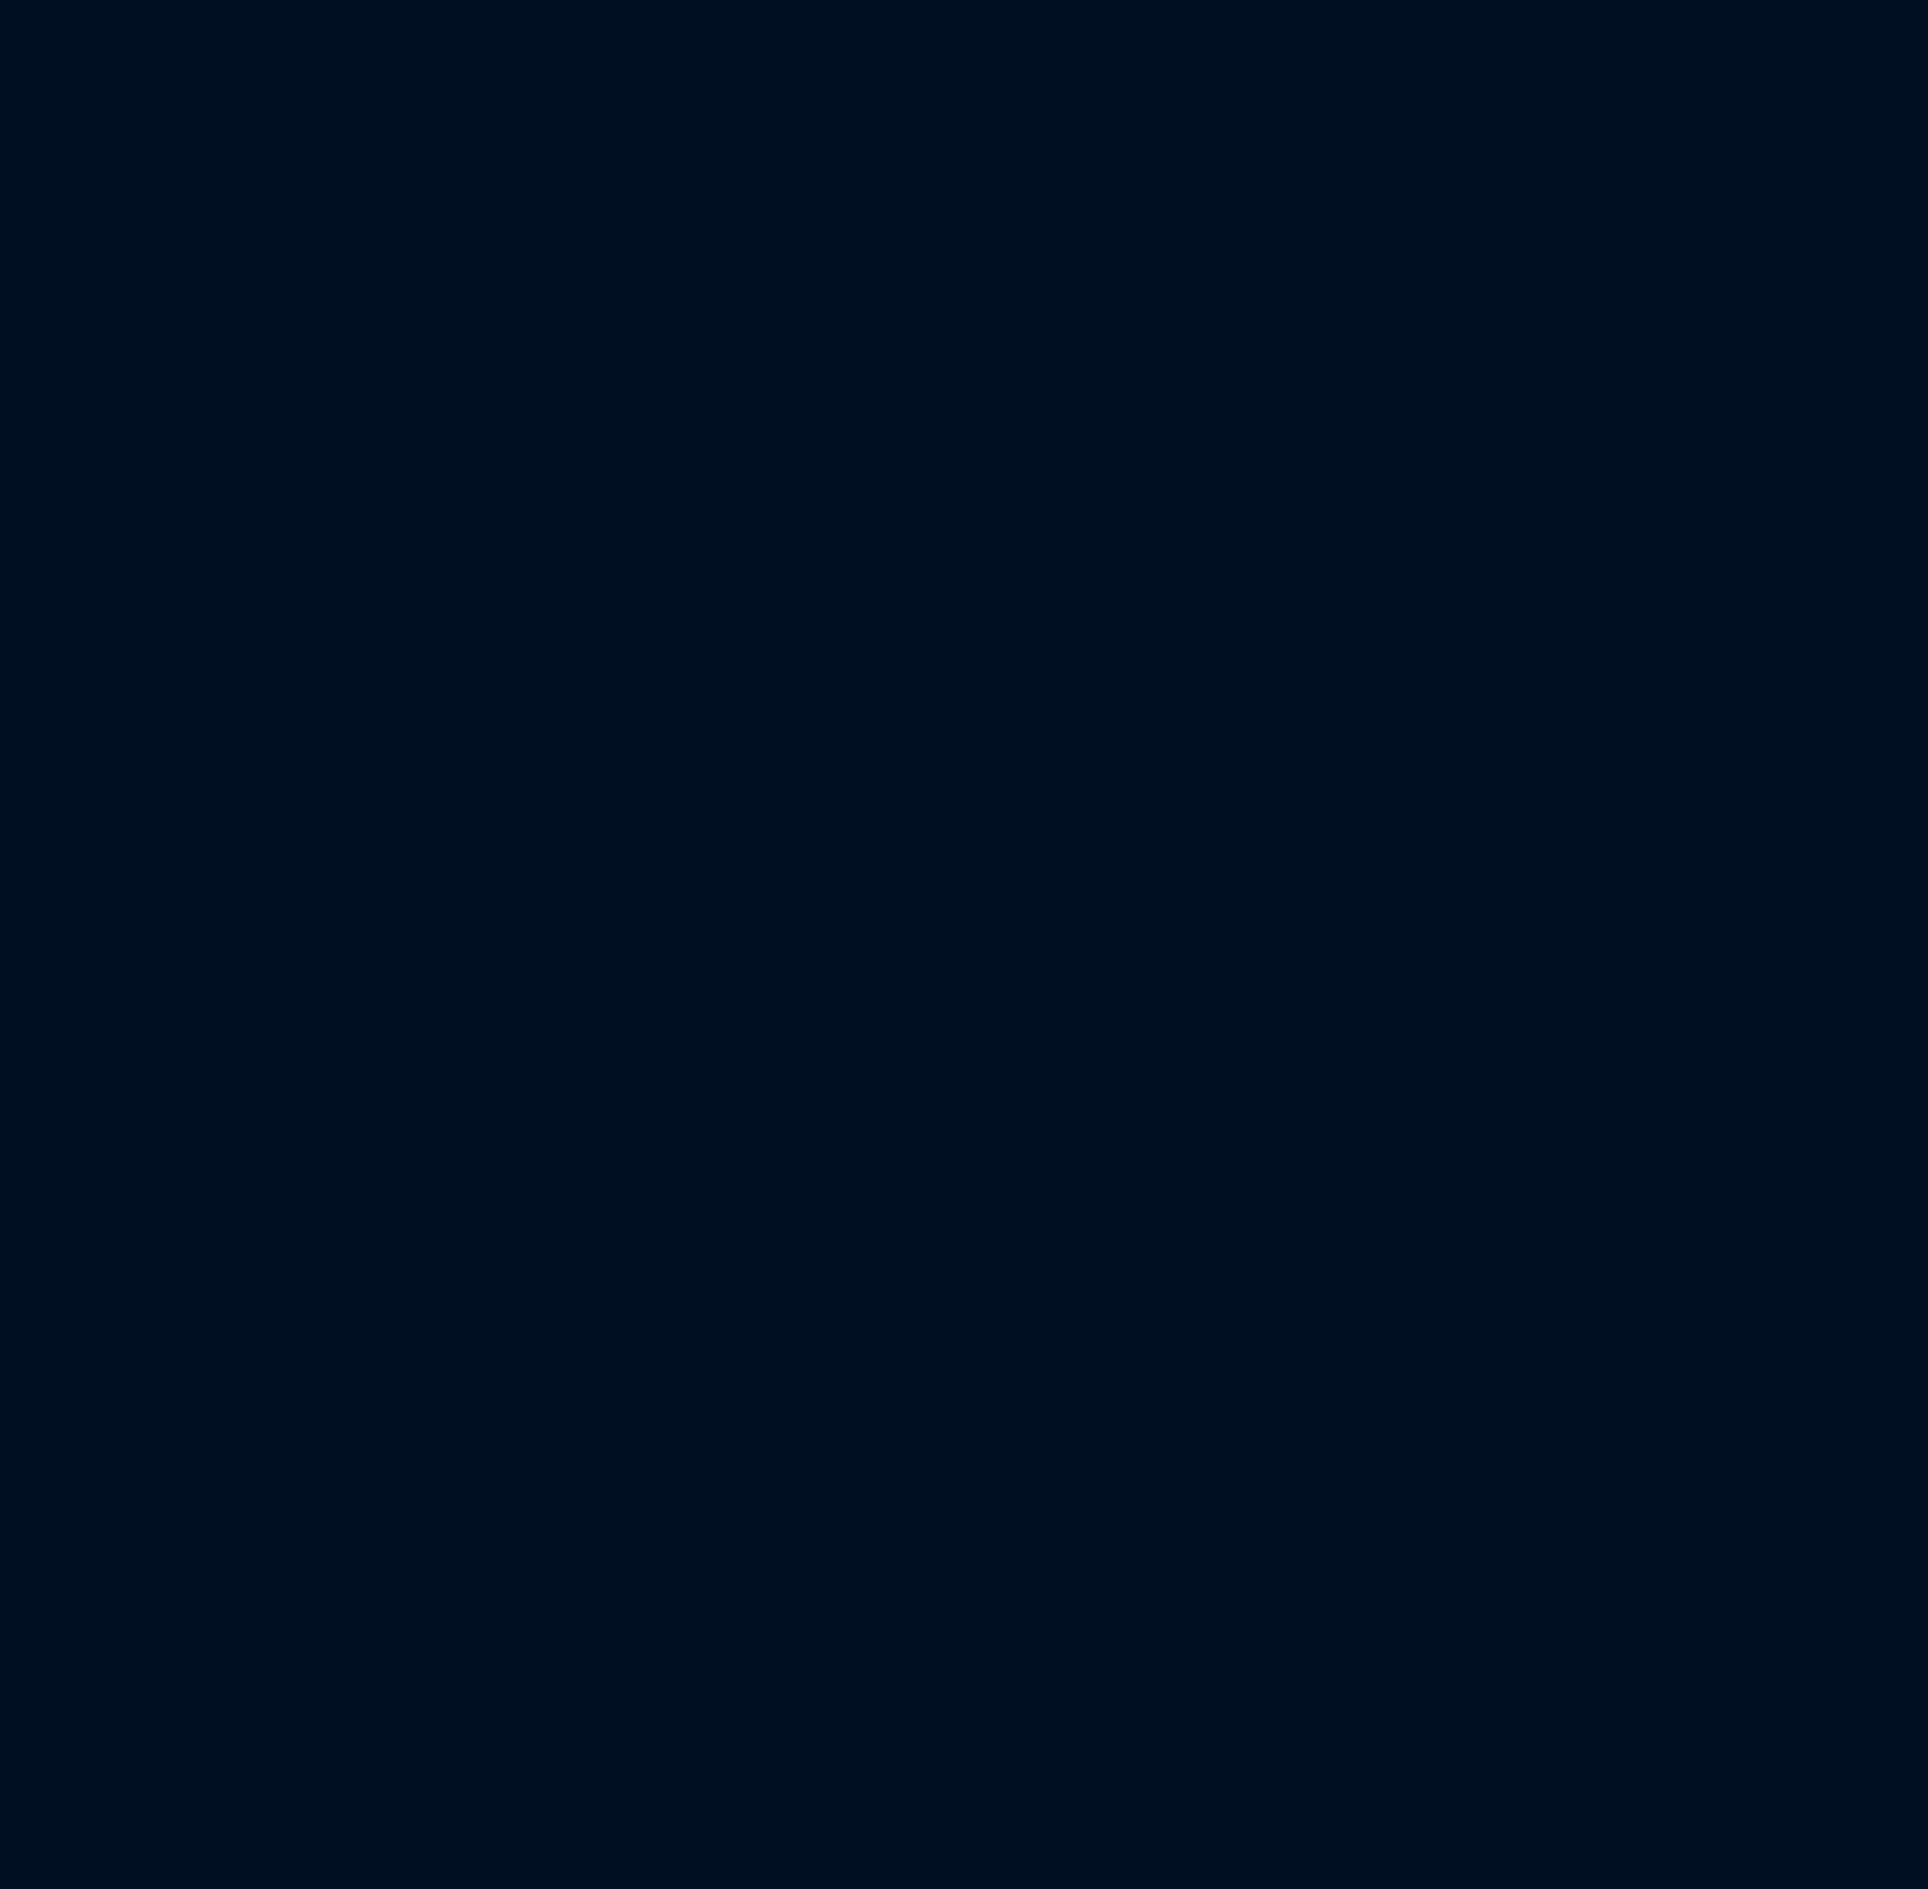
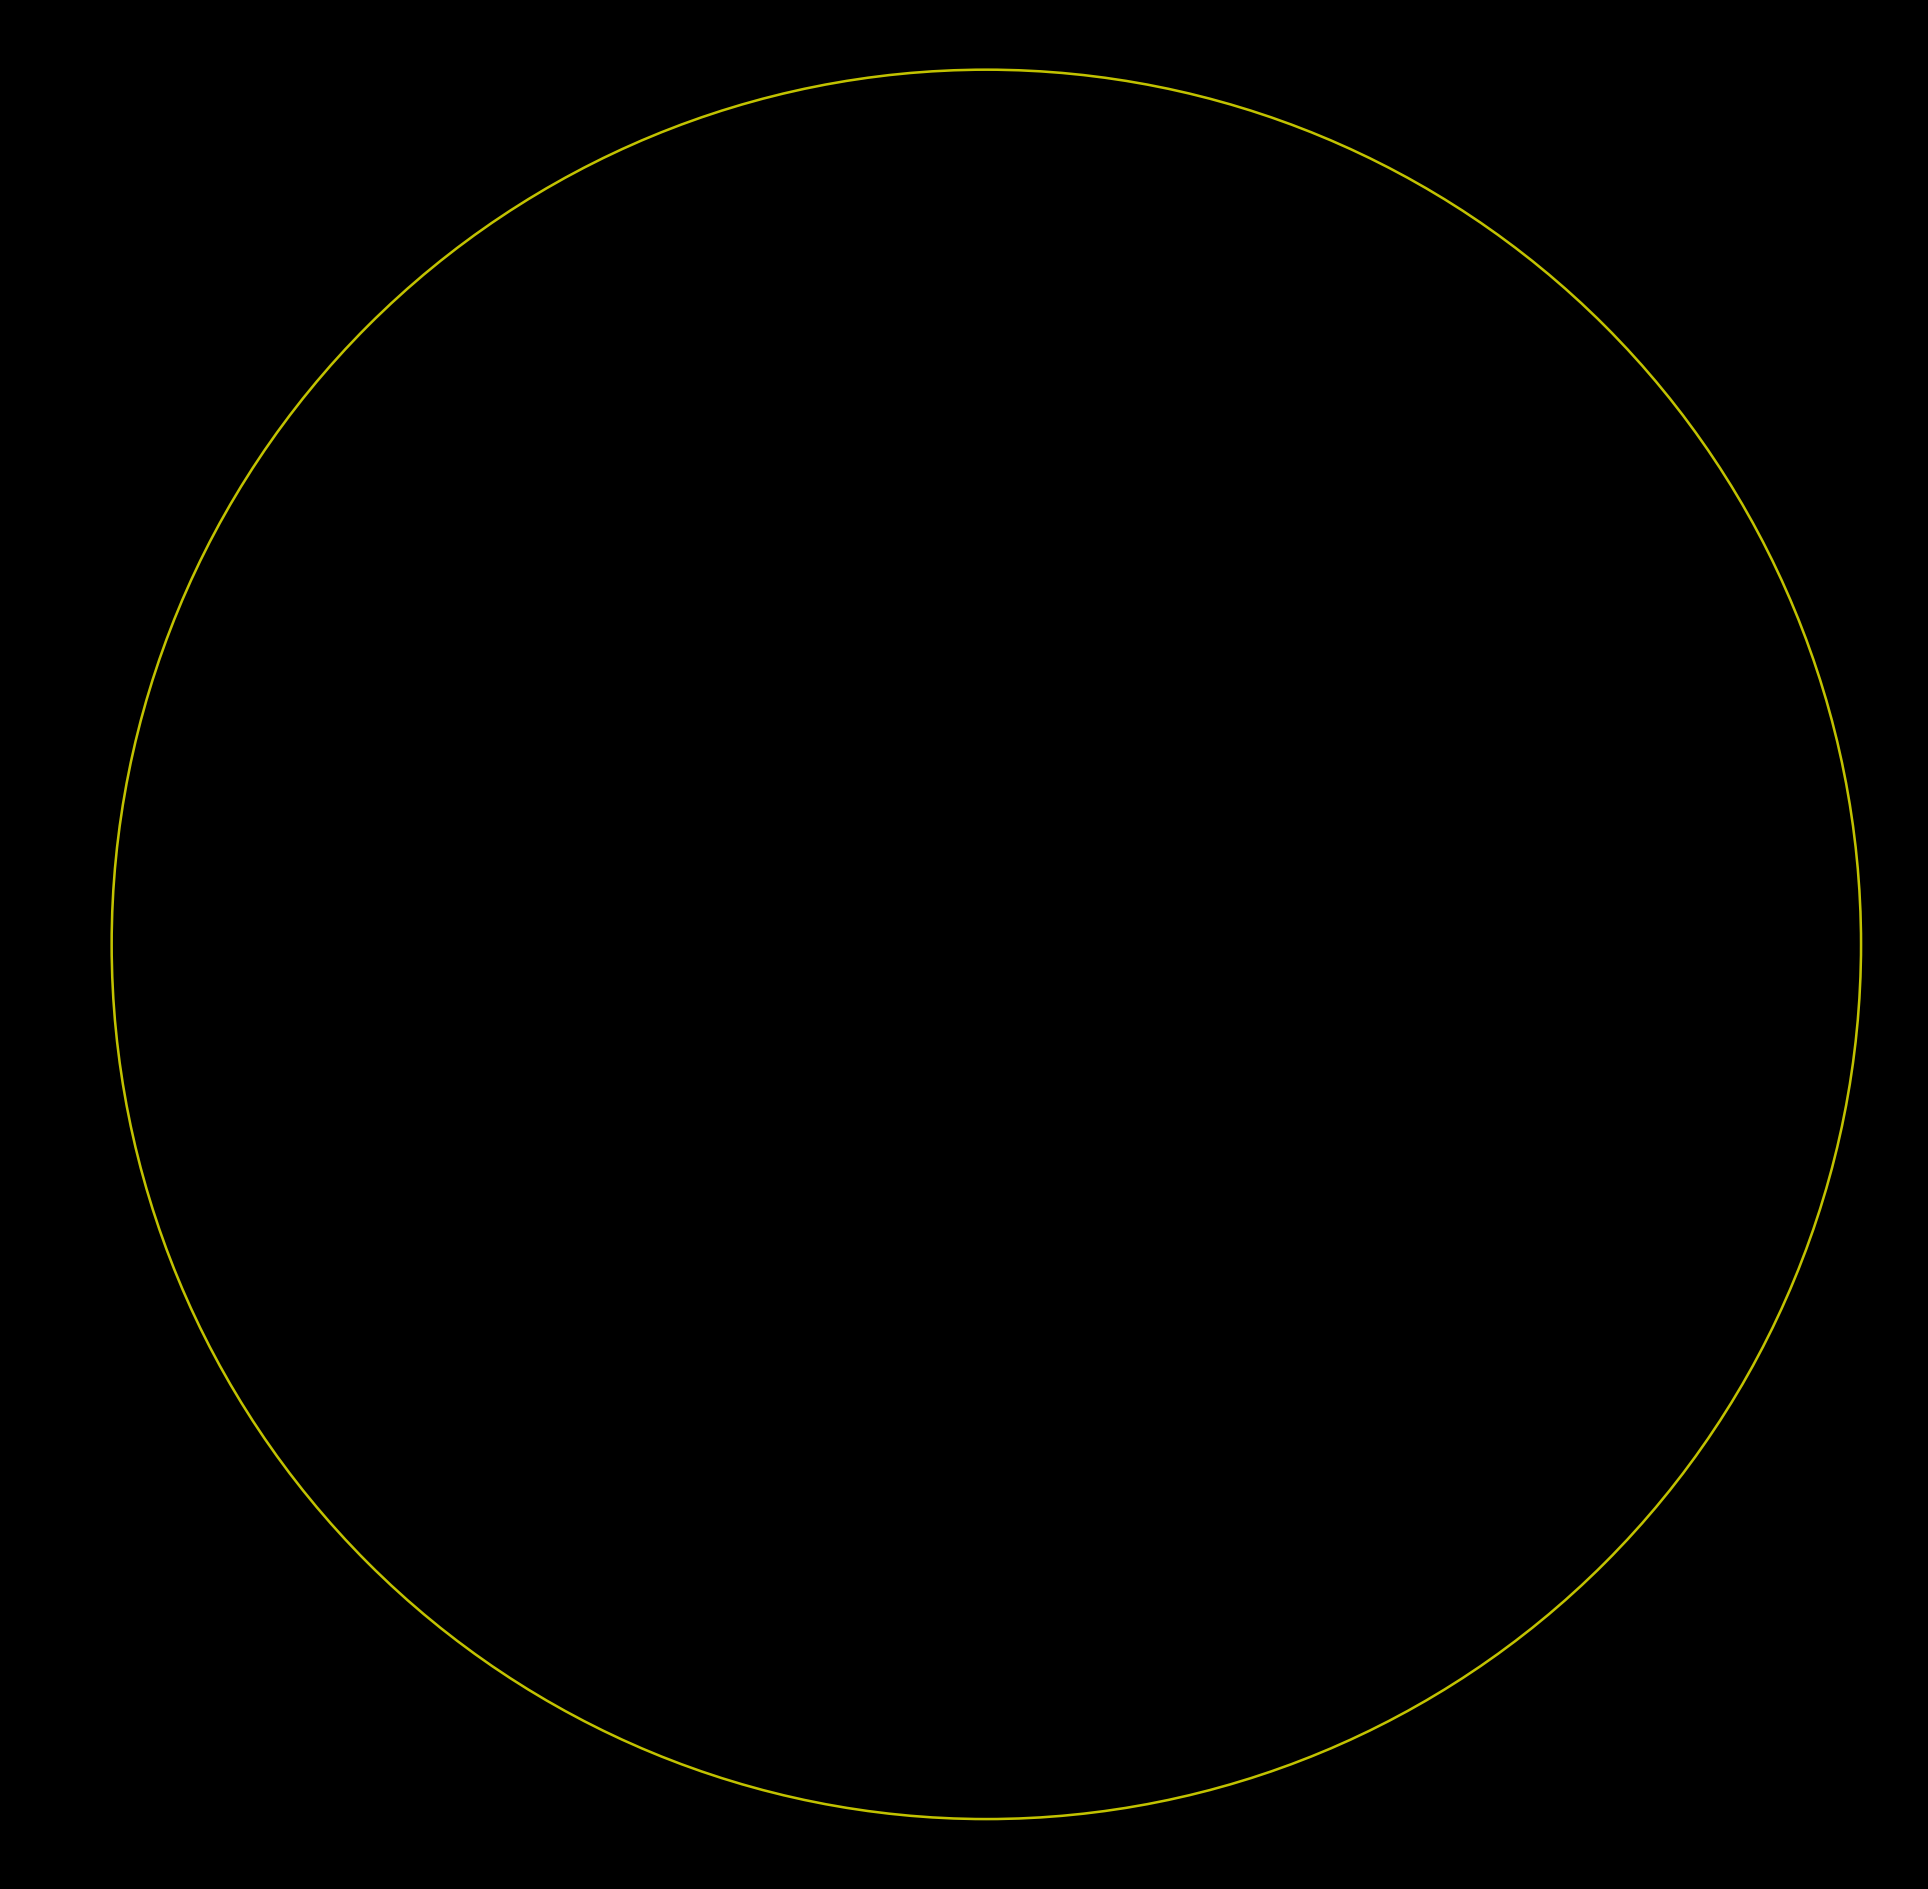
round board edge: none -> [110, 68, 1863, 1821]

